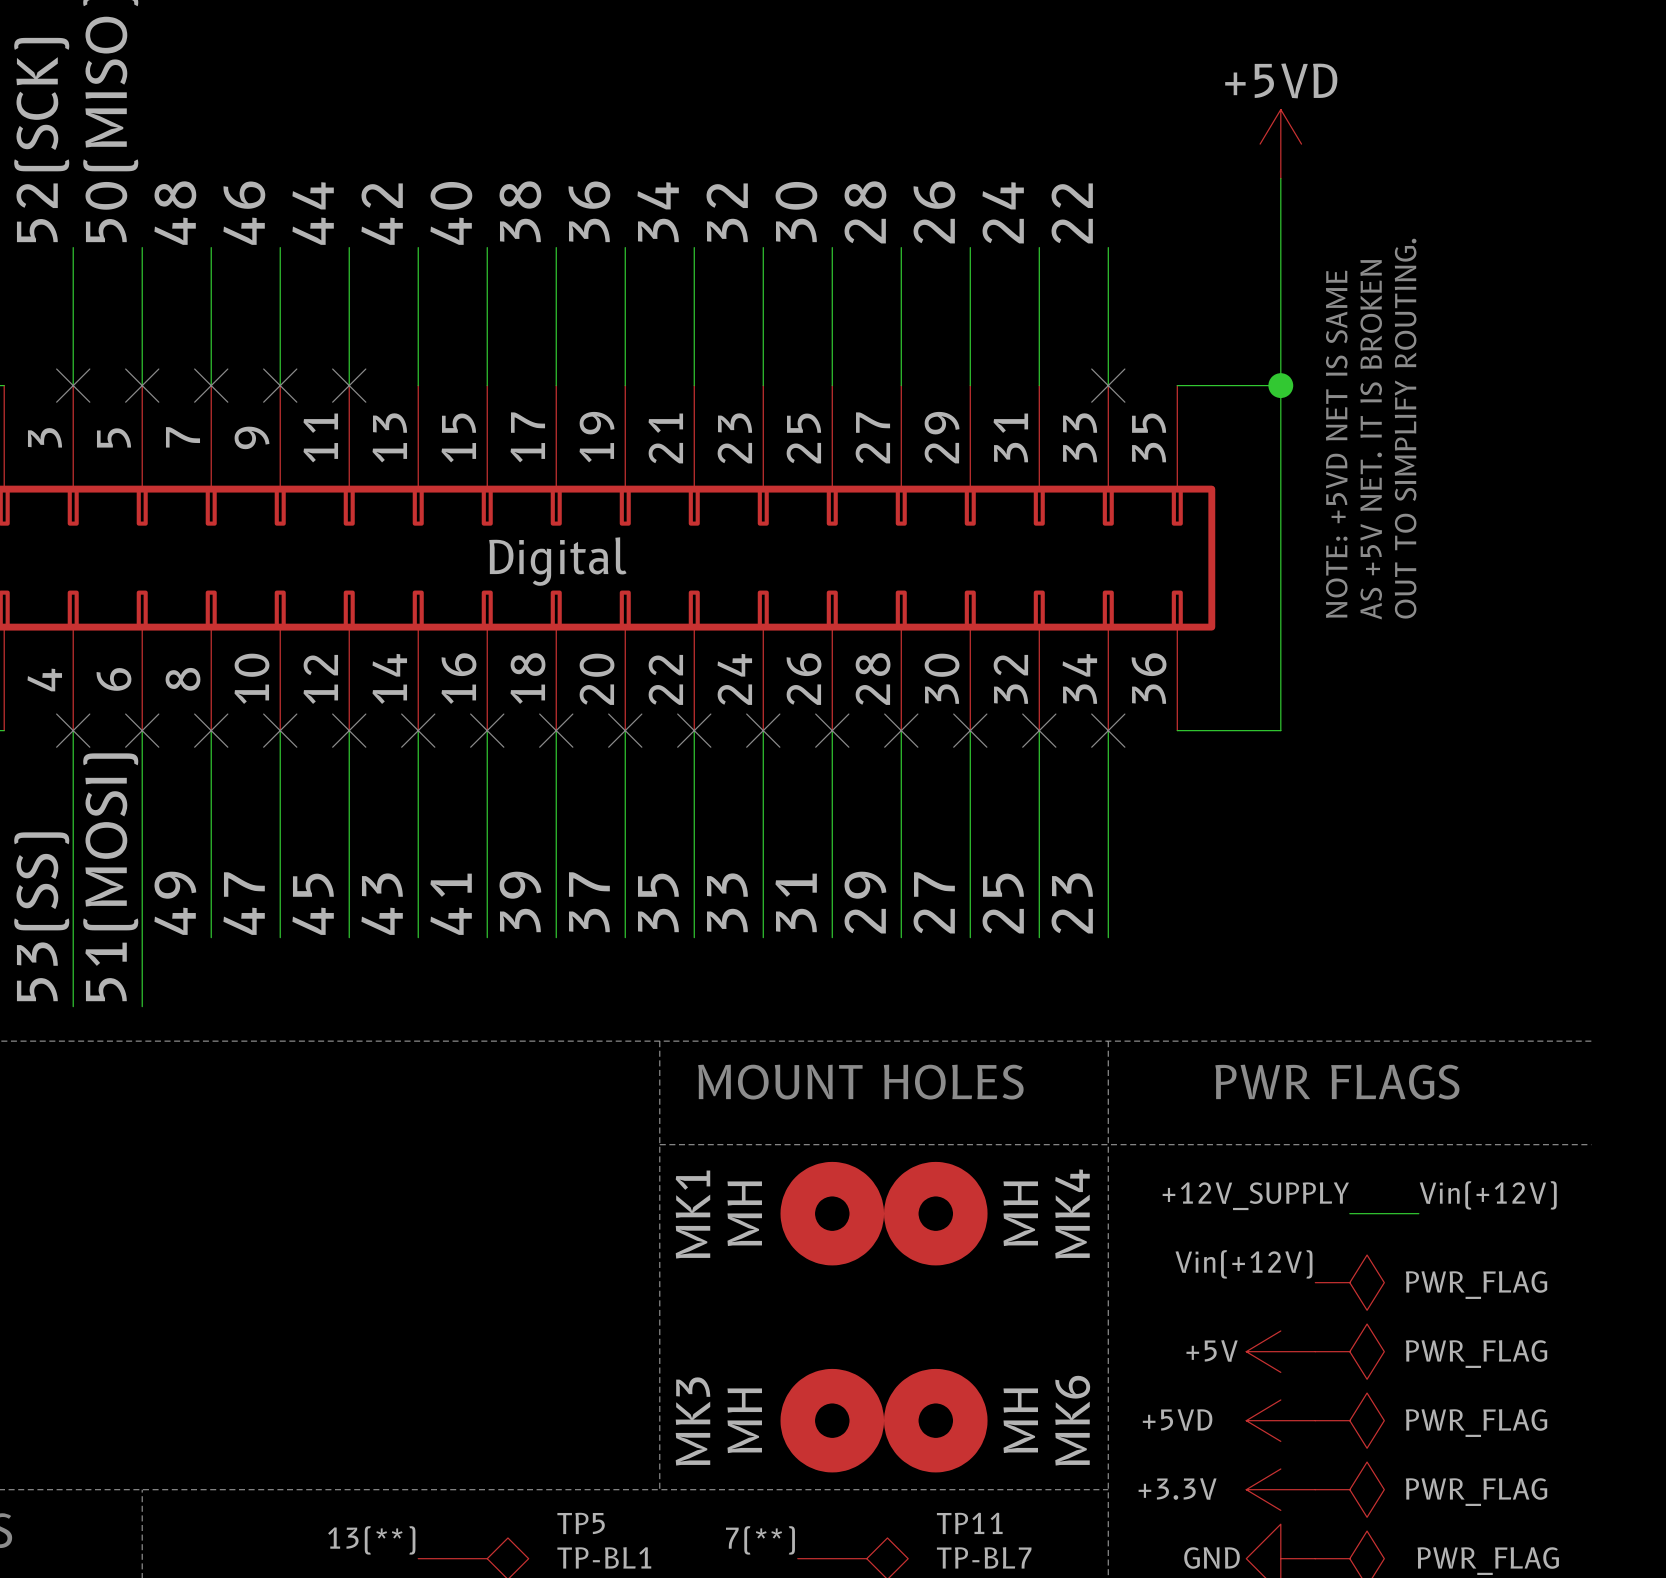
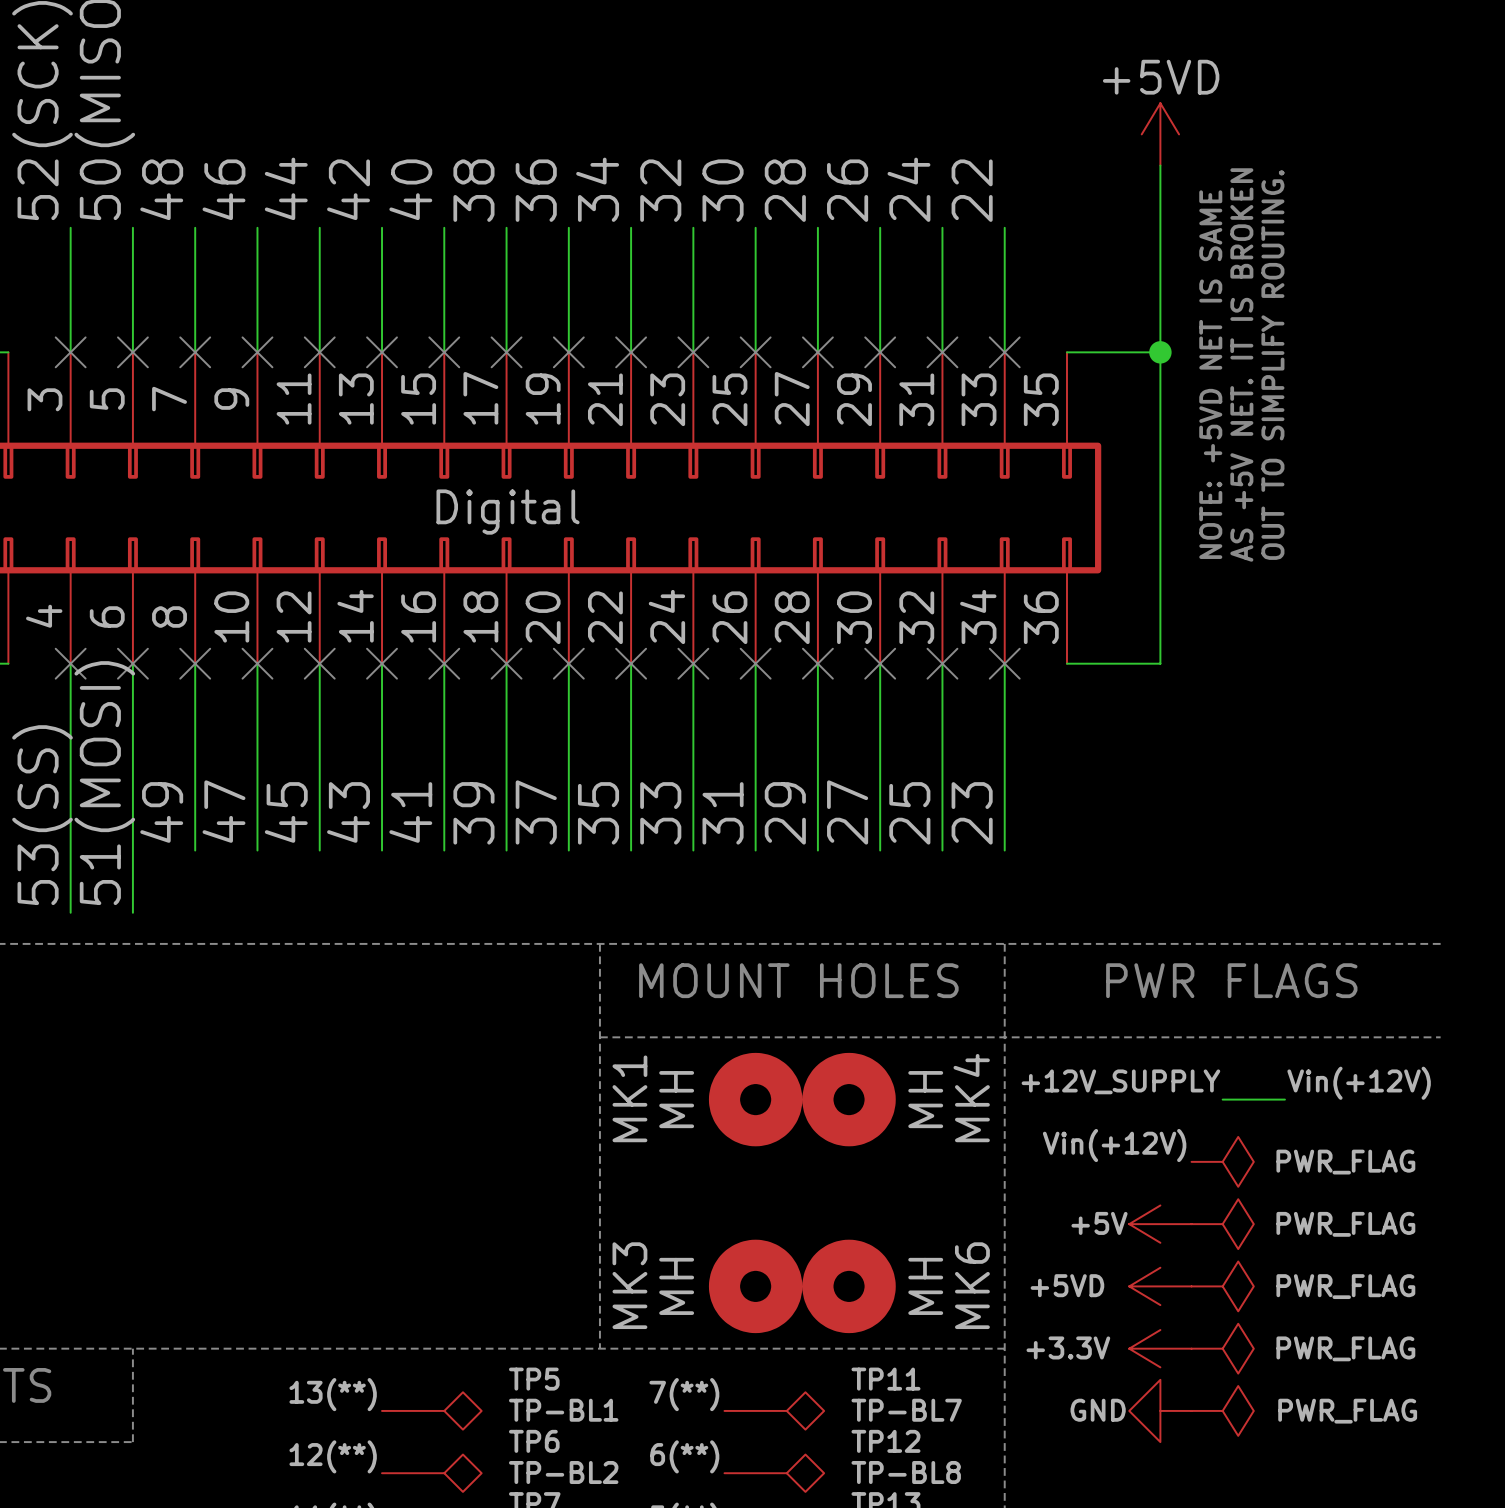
no-connect mark: none -> (382, 352)
no-connect mark: none -> (444, 352)
no-connect mark: none -> (506, 352)
no-connect mark: none -> (568, 352)
no-connect mark: none -> (631, 352)
no-connect mark: none -> (693, 352)
no-connect mark: none -> (755, 352)
no-connect mark: none -> (817, 352)
no-connect mark: none -> (880, 352)
no-connect mark: none -> (942, 352)

